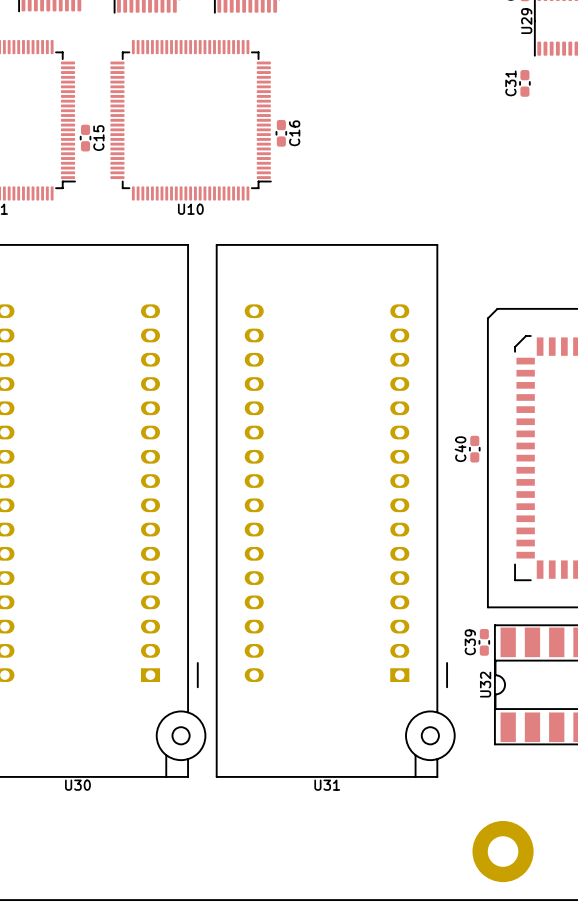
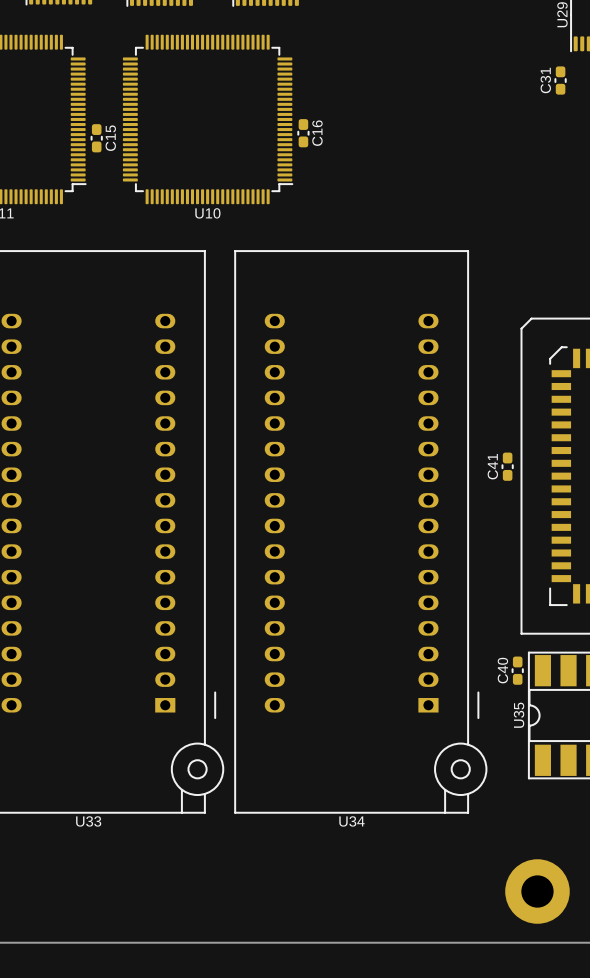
C40 name: C40 (460, 449) -> C41 (492, 466)
C39 name: C39 (470, 642) -> C40 (502, 670)
U32 name: U32 (485, 684) -> U35 (519, 715)
U30 name: U30 (77, 785) -> U33 (88, 821)
U31 name: U31 (327, 785) -> U34 (351, 821)

